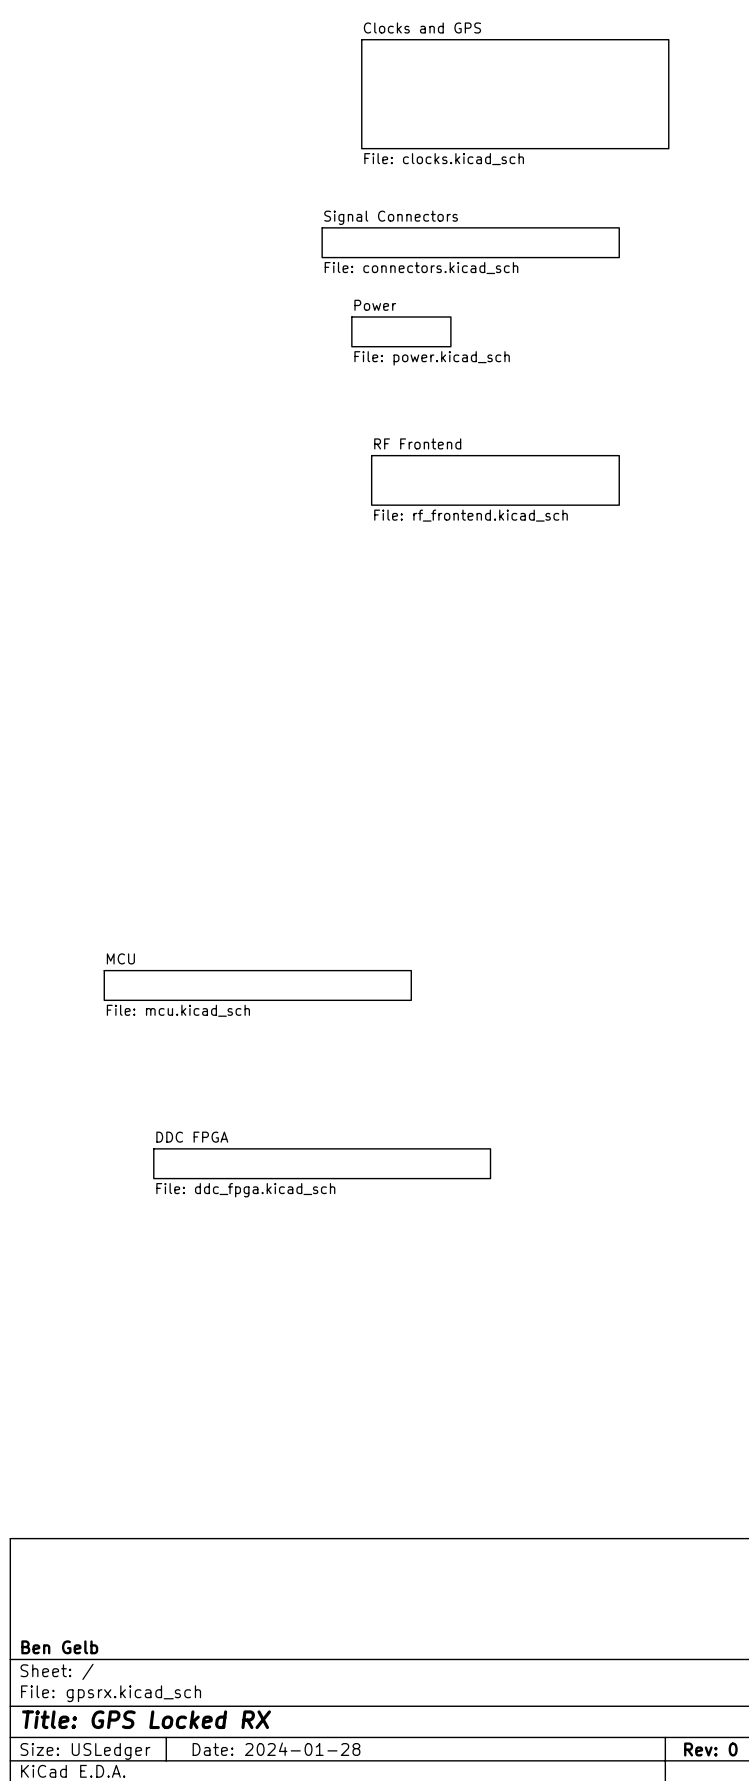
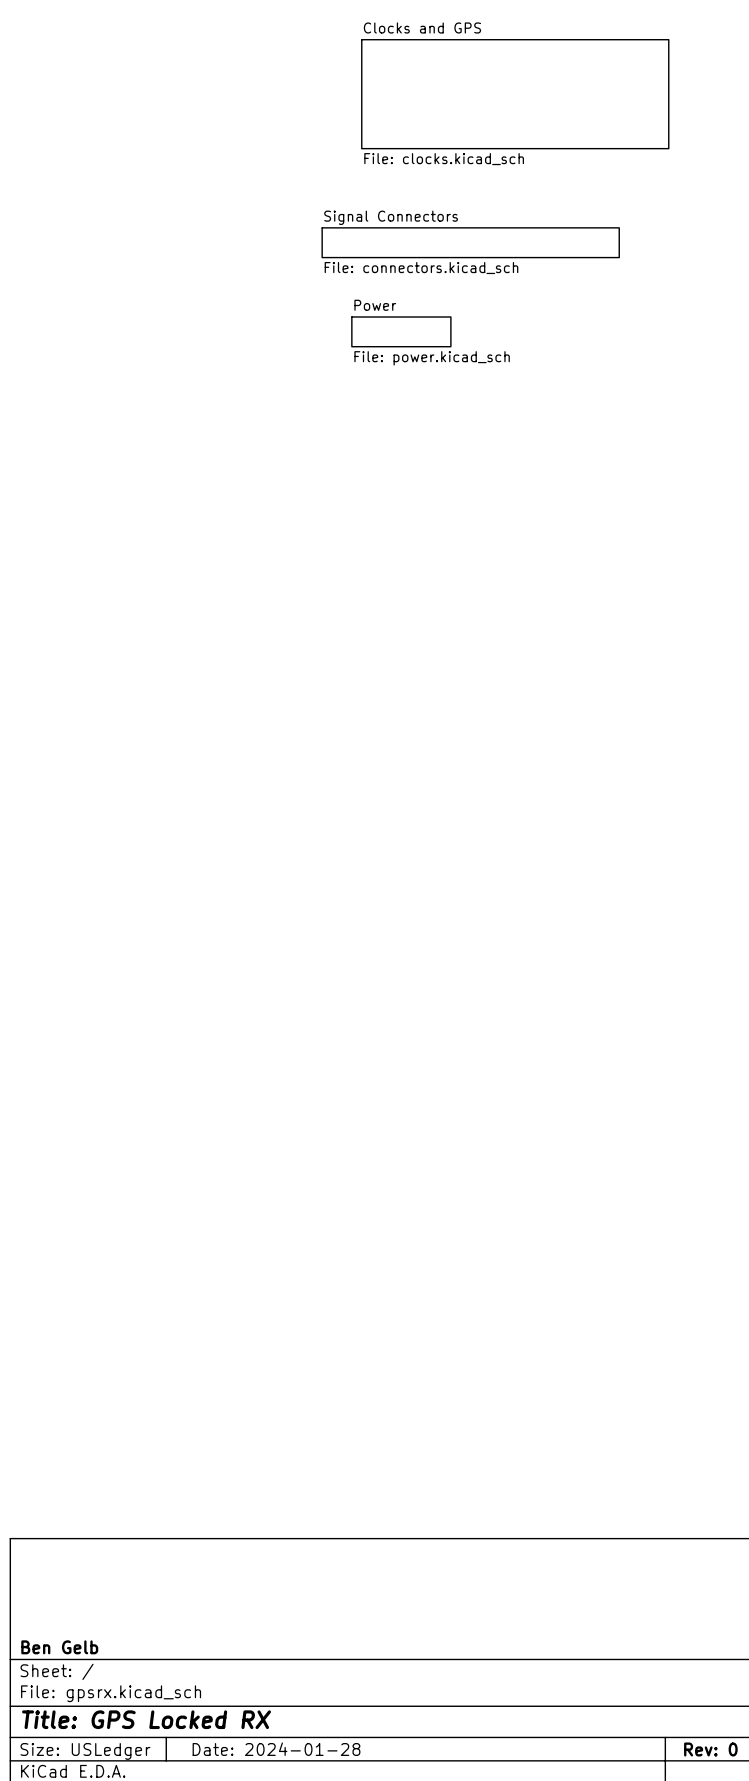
sheet RF Frontend: File: rf_frontend.kicad_sch (495, 480) -> none
sheet MCU: File: mcu.kicad_sch (257, 985) -> none
sheet DDC FPGA: File: ddc_fpga.kicad_sch (322, 1163) -> none

